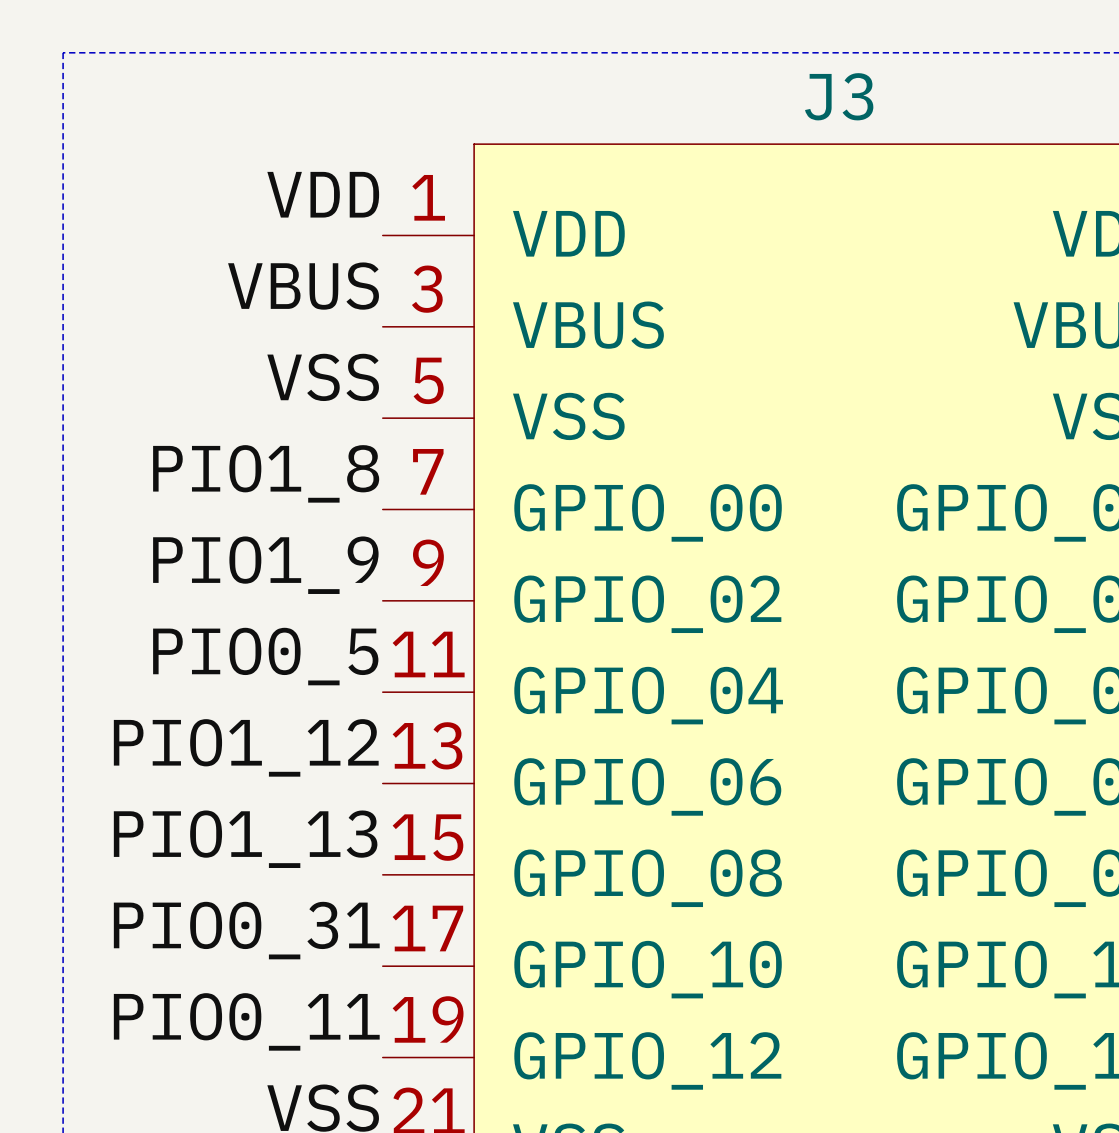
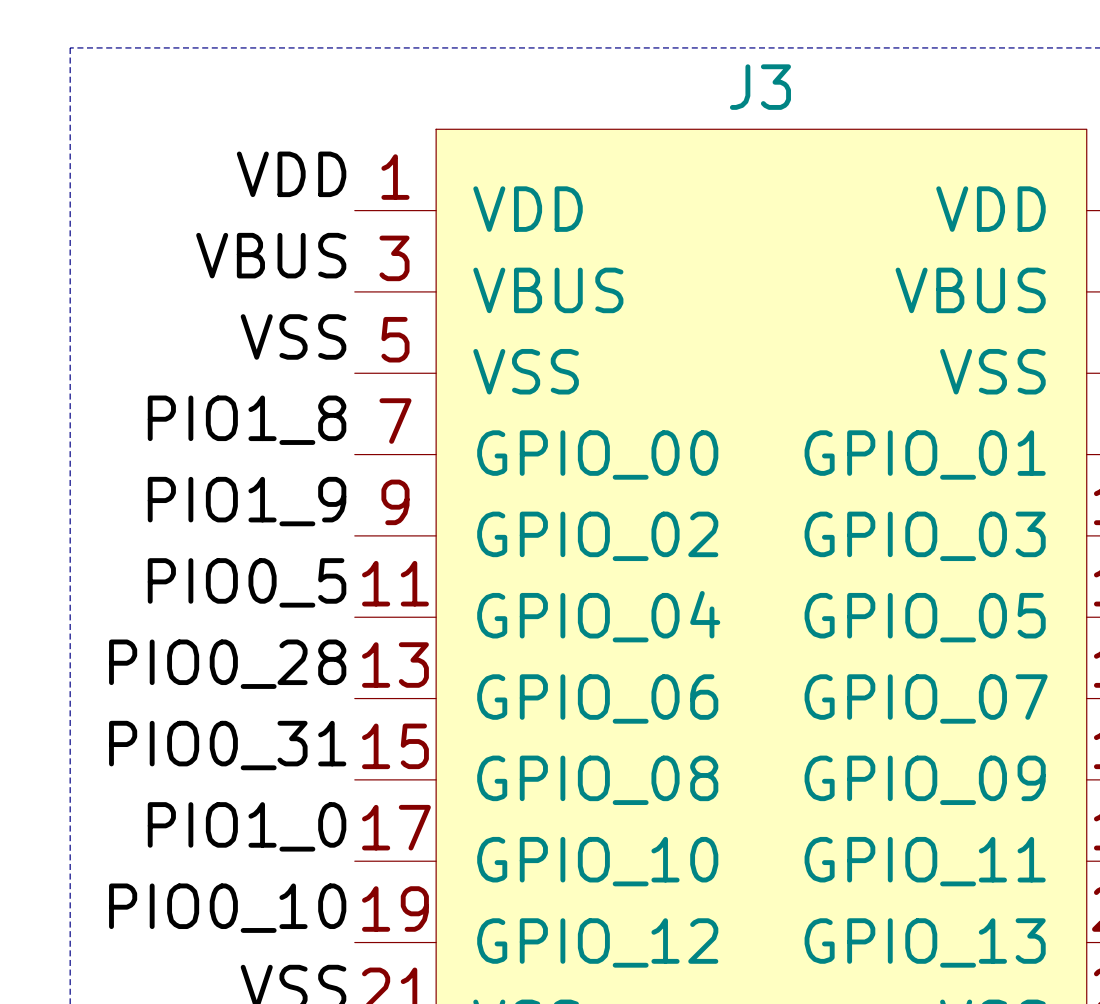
label: PIO1_12 (246, 747) -> PIO0_28 (227, 664)
label: PIO1_13 (245, 839) -> PIO0_31 (227, 745)
label: PIO0_31 (246, 930) -> PIO1_0 (247, 826)
label: PIO0_11 (246, 1021) -> PIO0_10 (227, 908)

